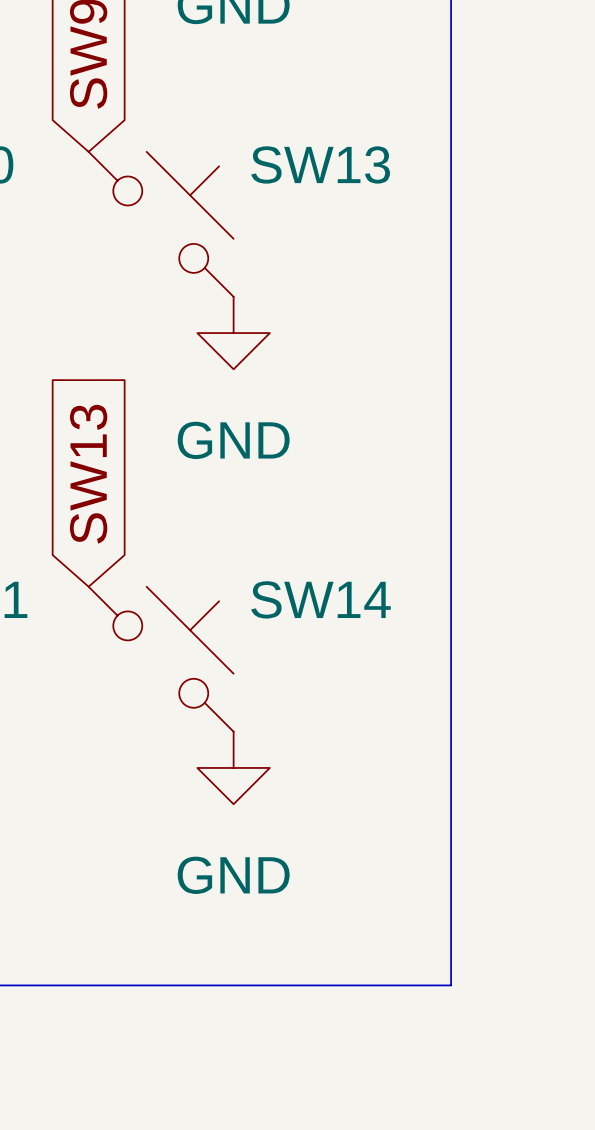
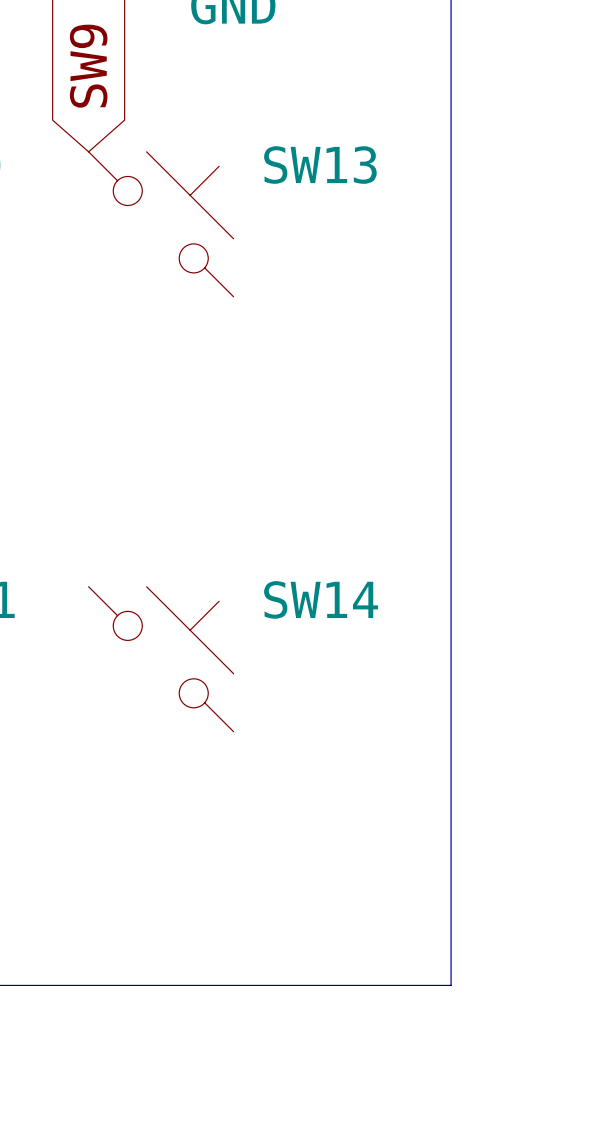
power symbol: GND (233, 333) -> none
global label: SW13 (88, 474) -> none
power symbol: GND (233, 767) -> none

